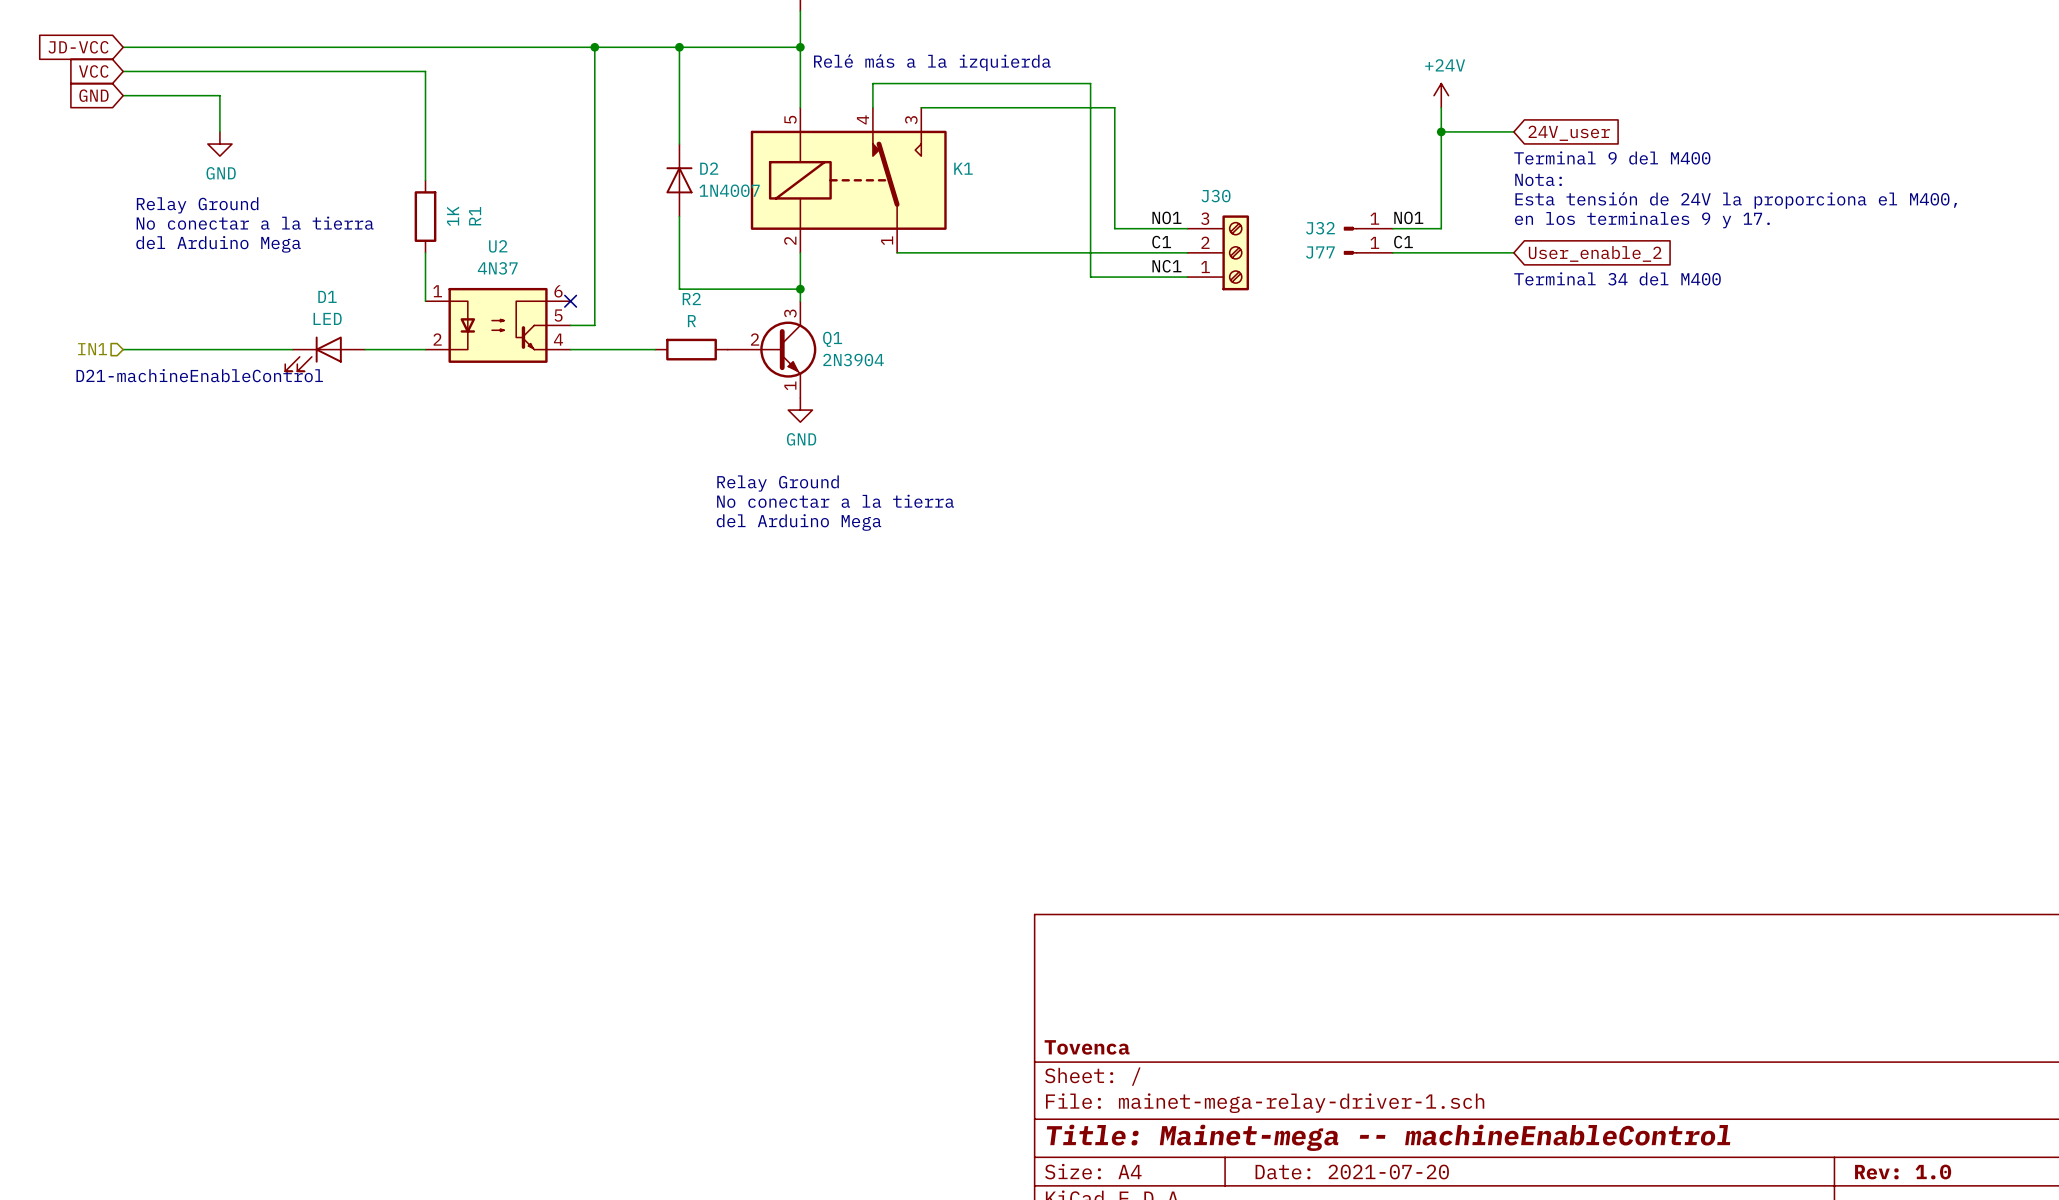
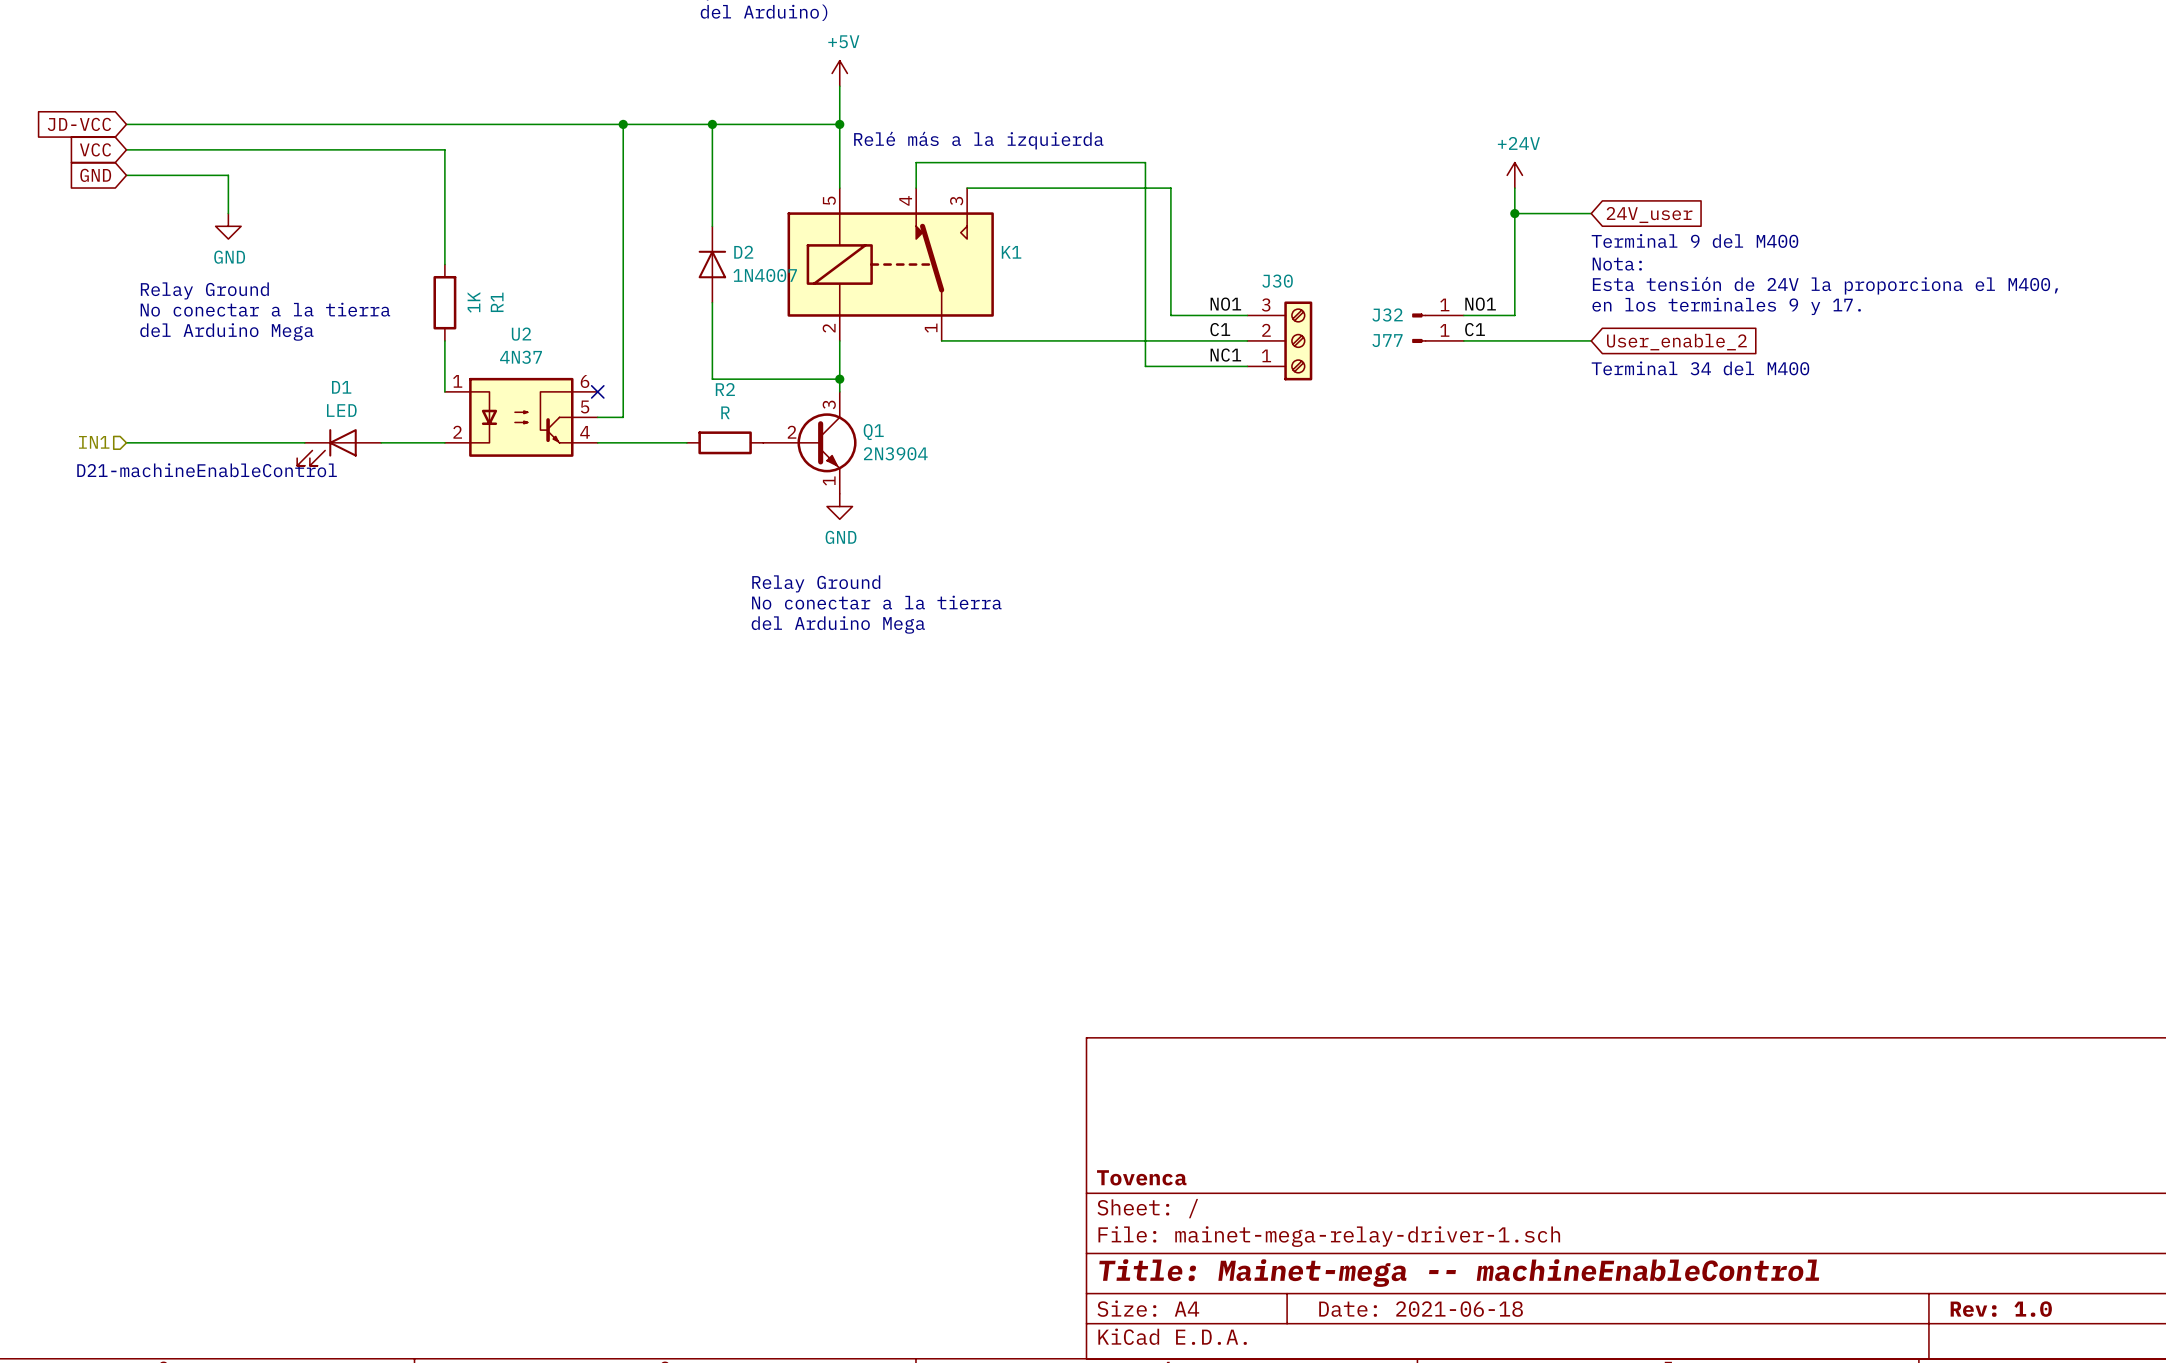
title block: Date: 2021-07-20 (1352, 1172) -> Date: 2021-06-18 (1421, 1309)

